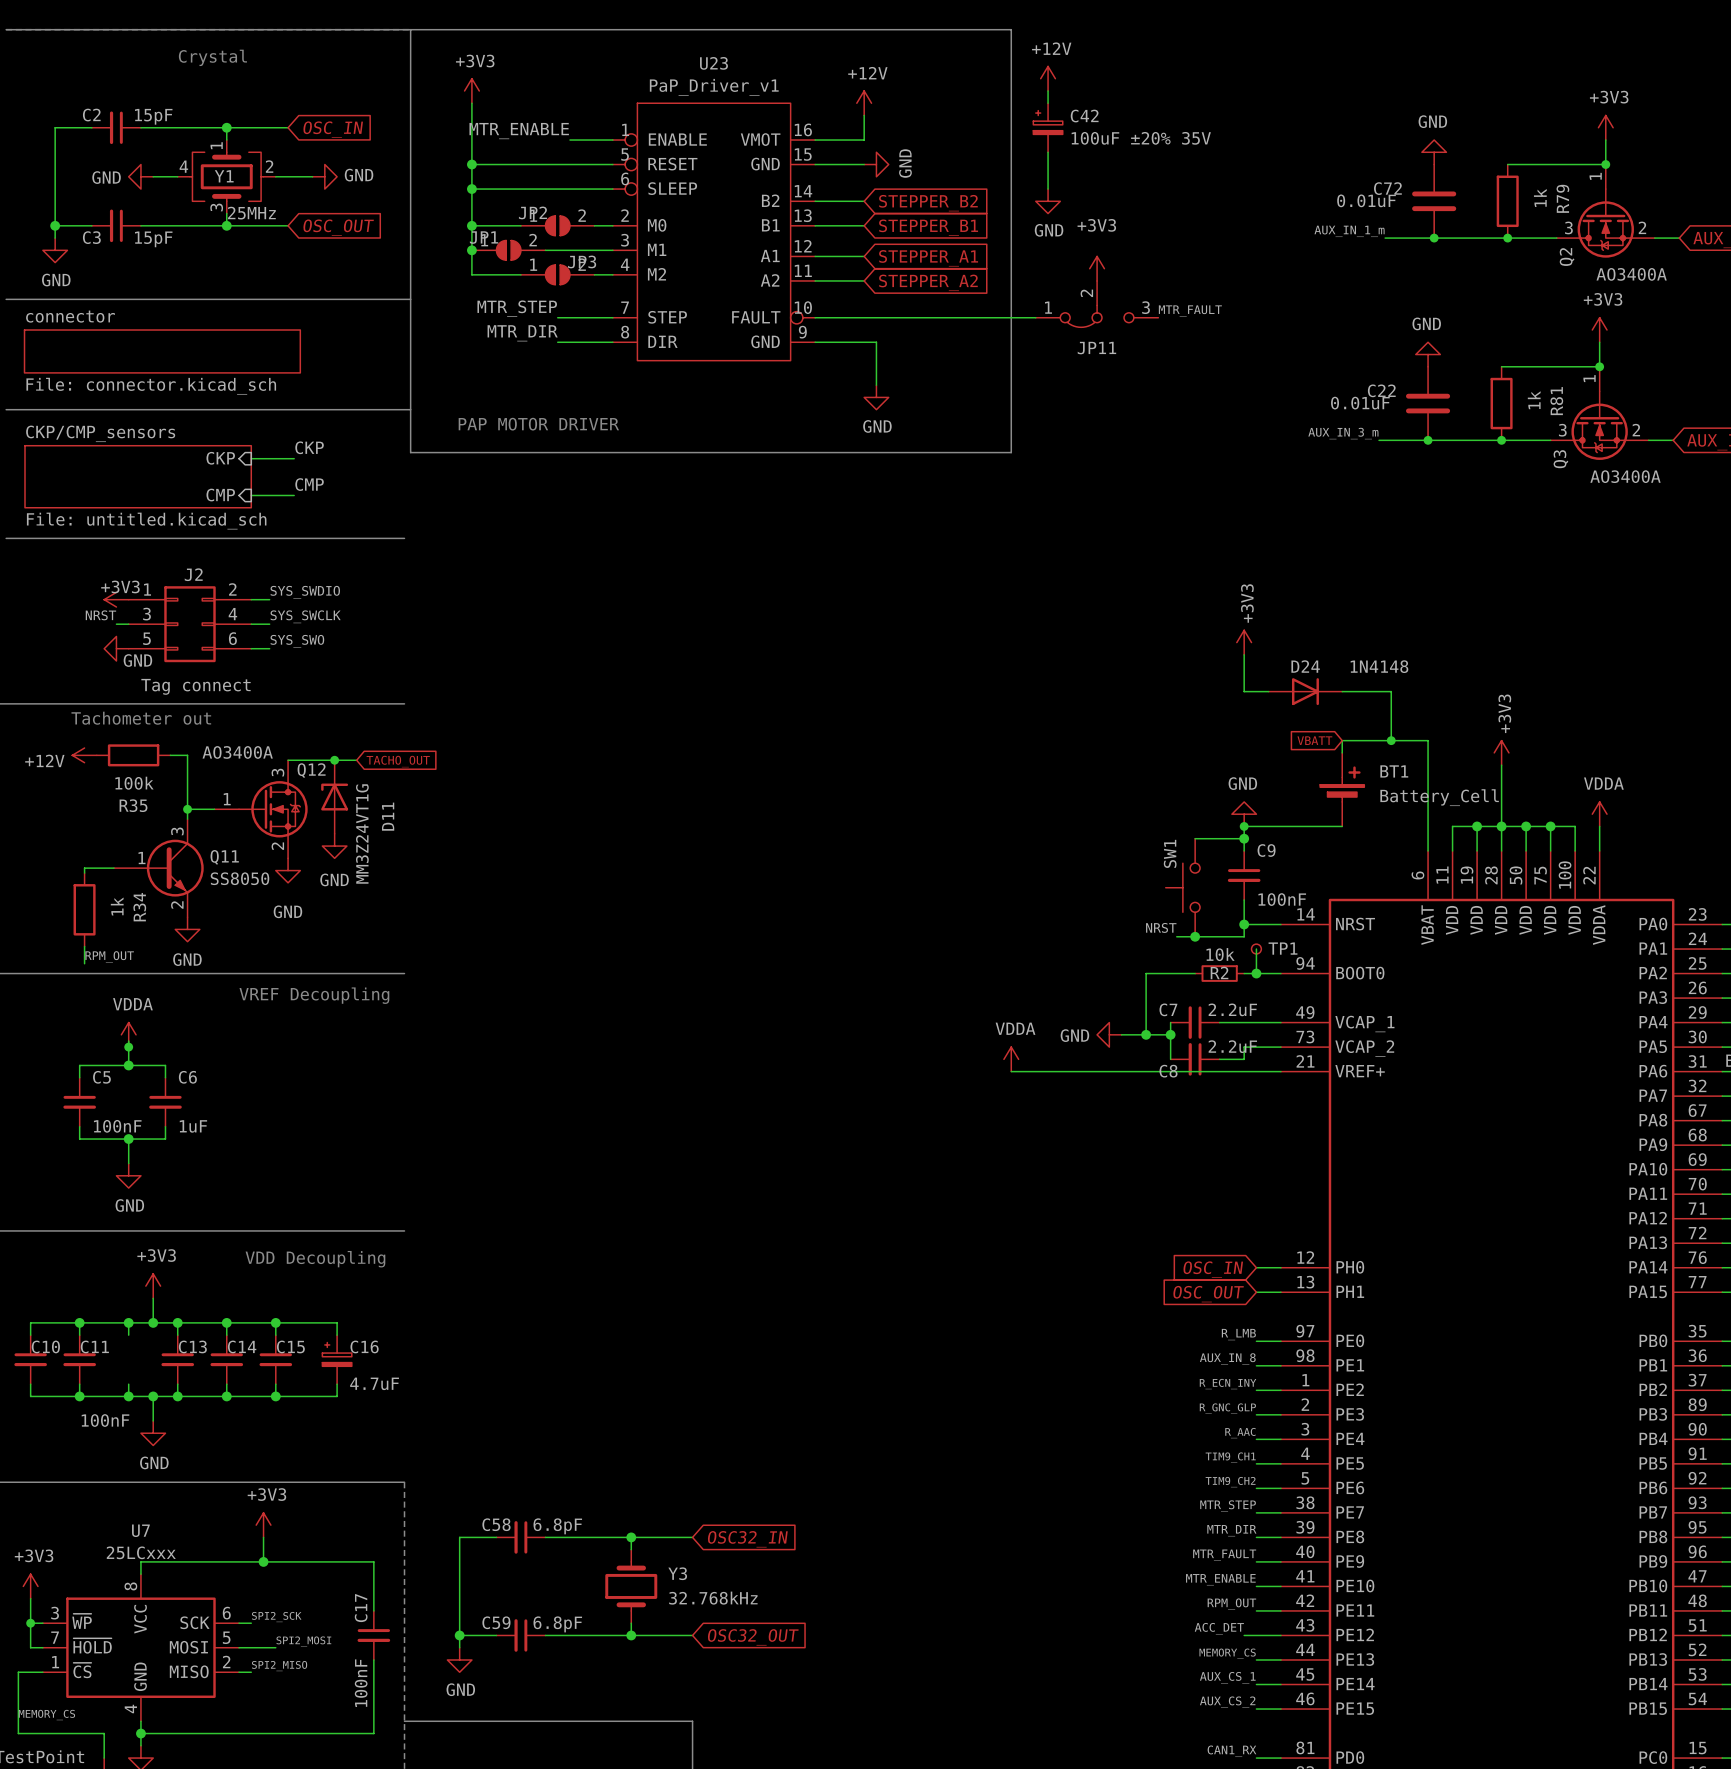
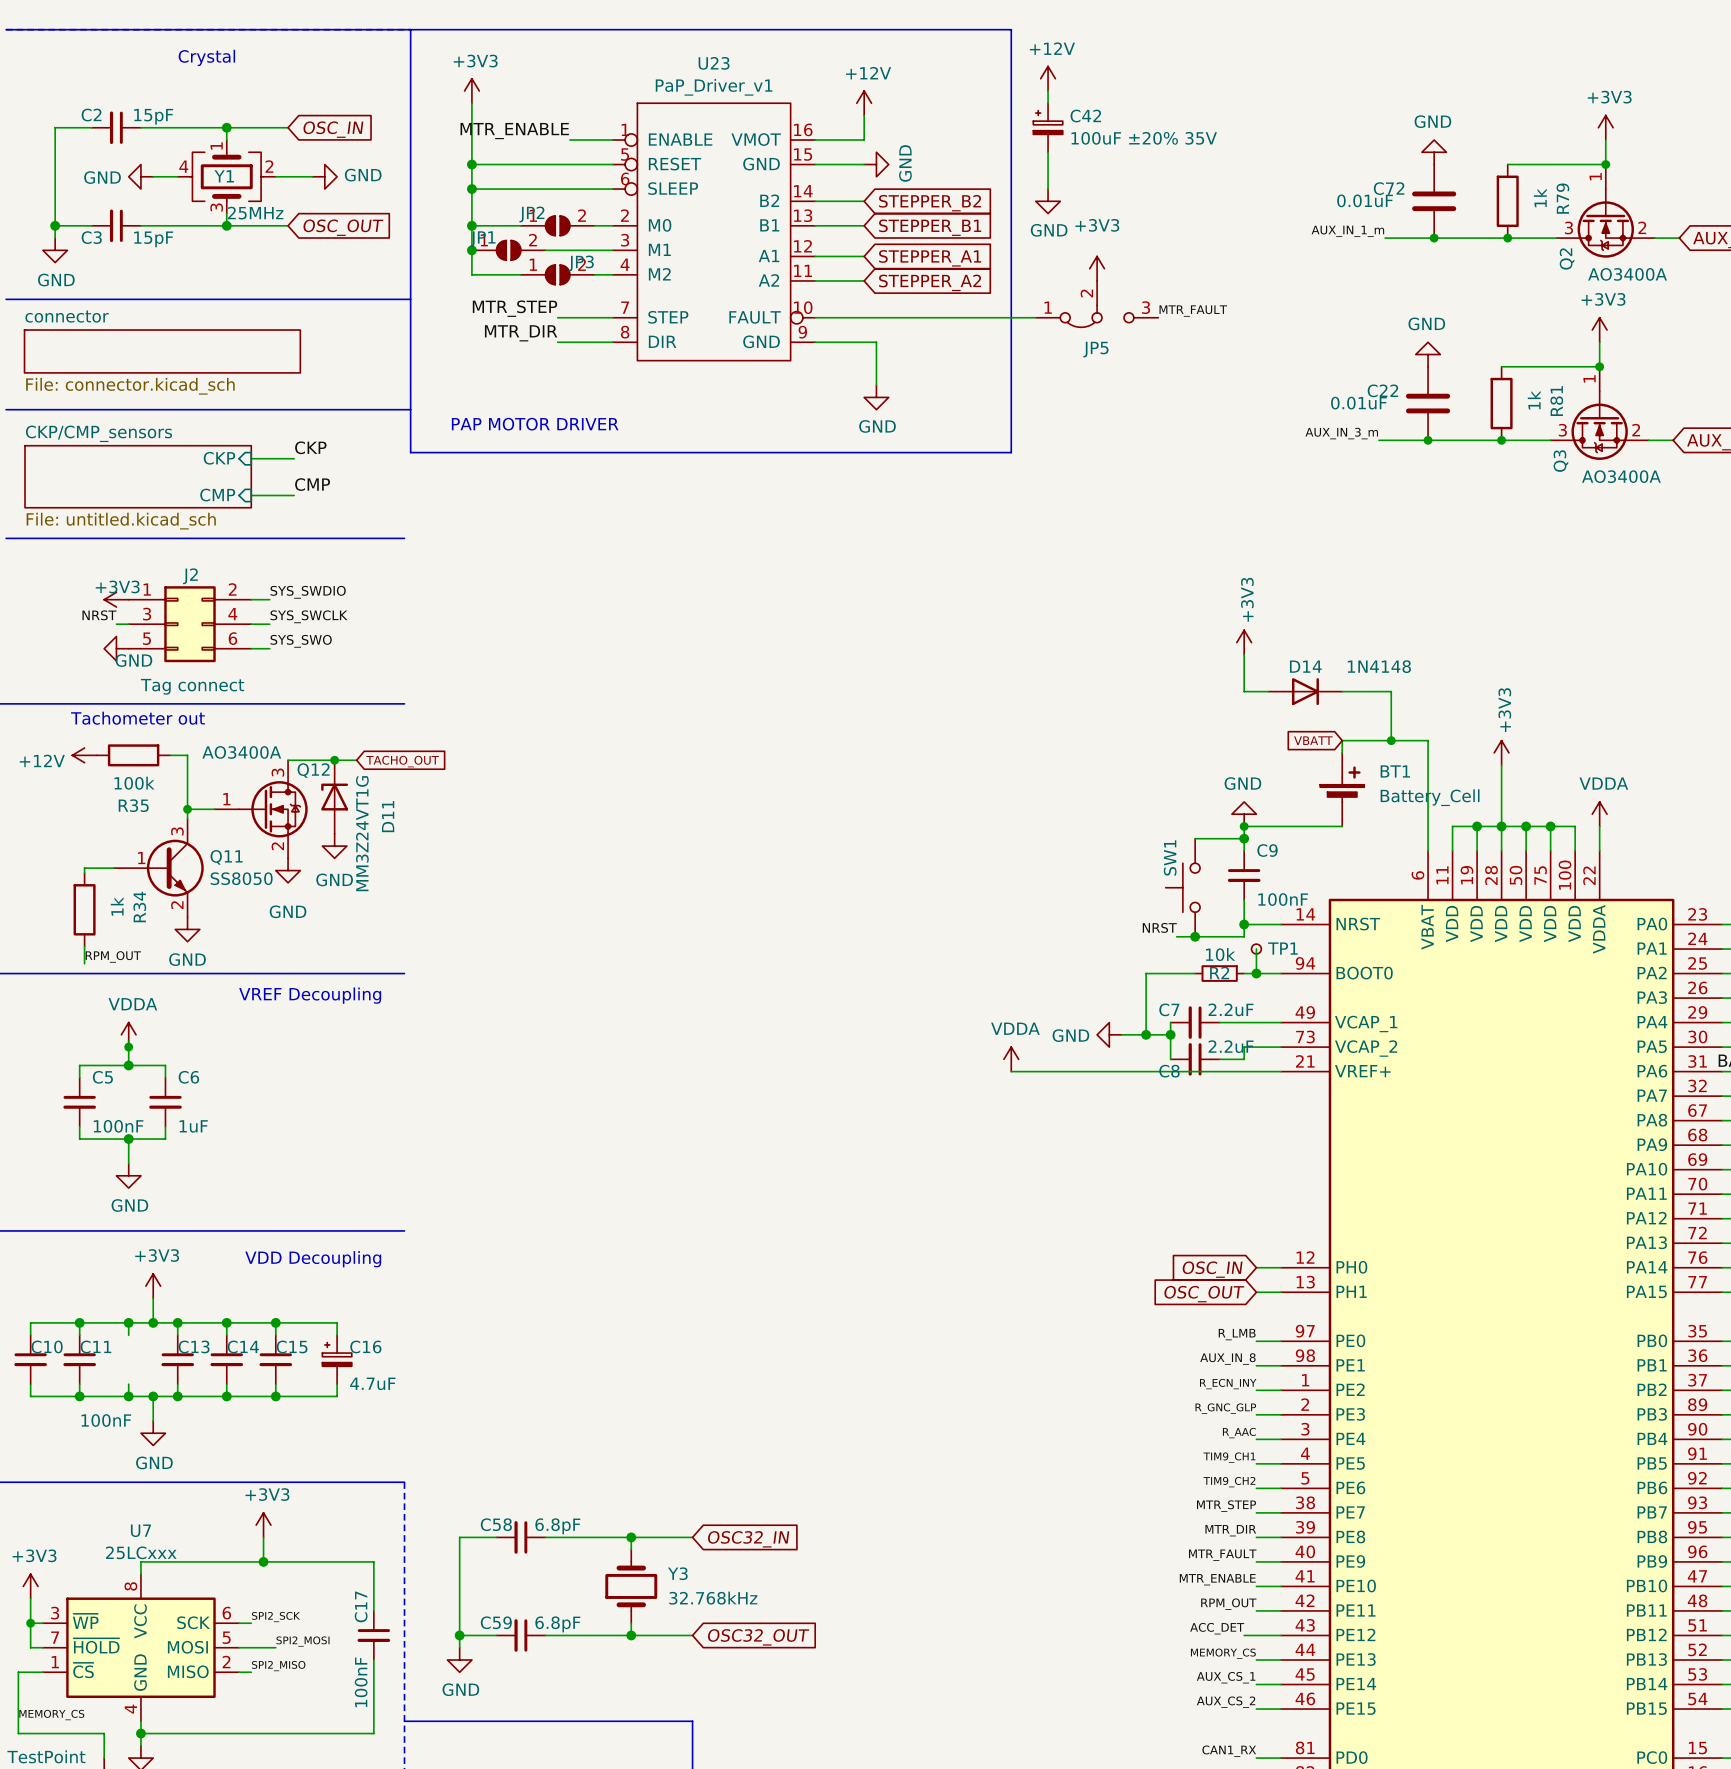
JP11 name: JP11 (1096, 348) -> JP5 (1095, 349)
D24 name: D24 (1305, 666) -> D14 (1305, 666)

